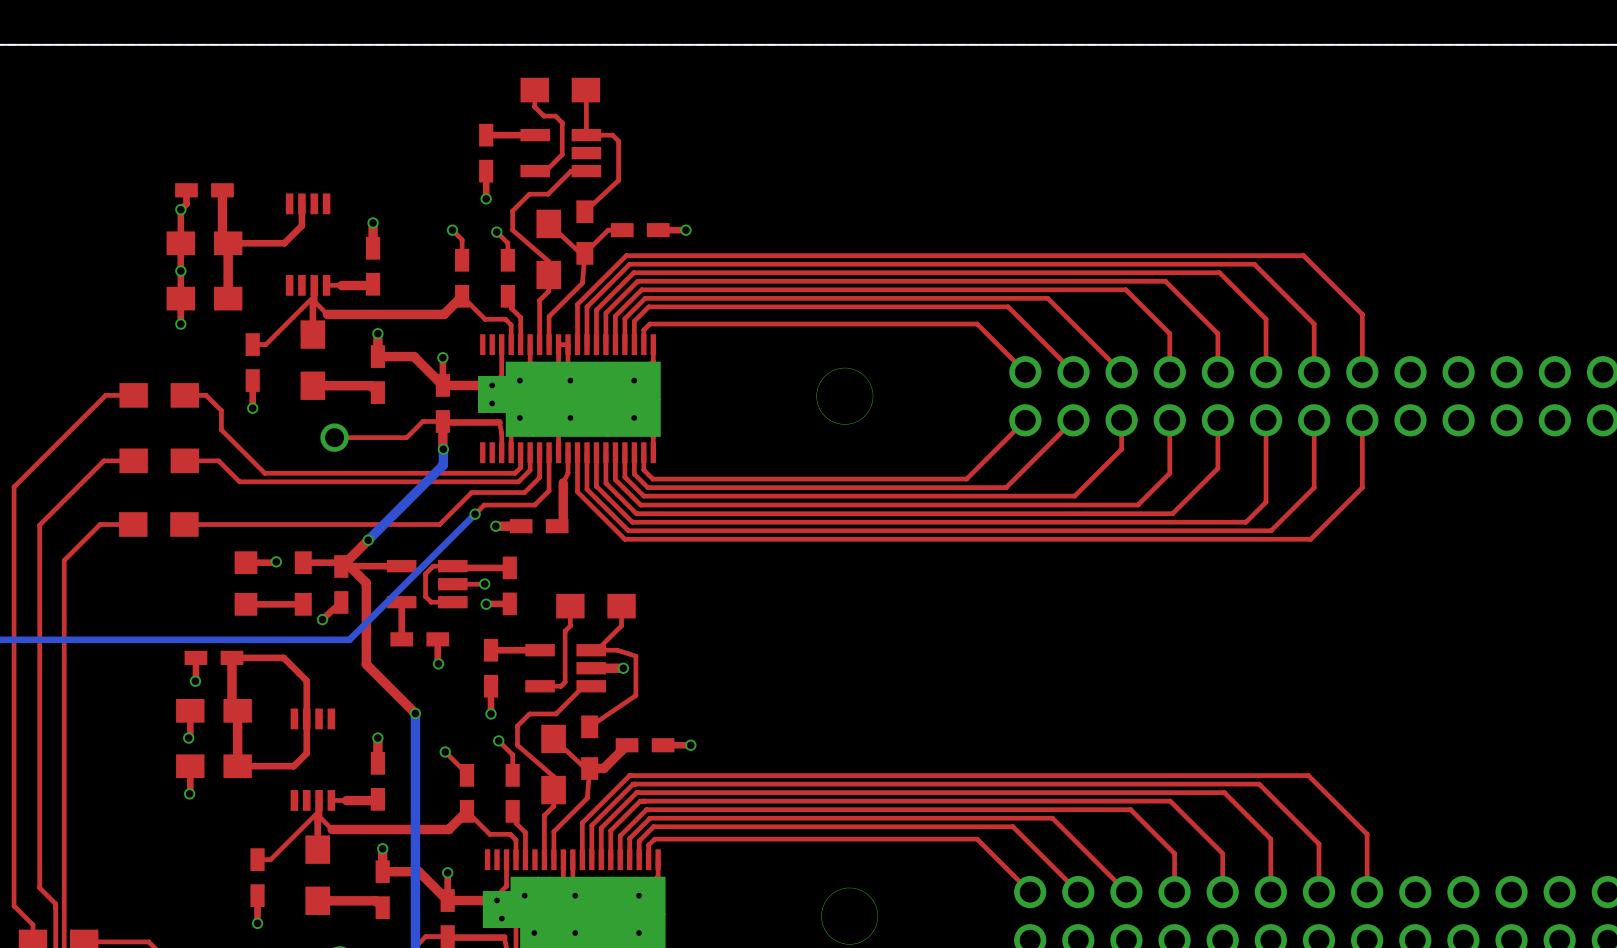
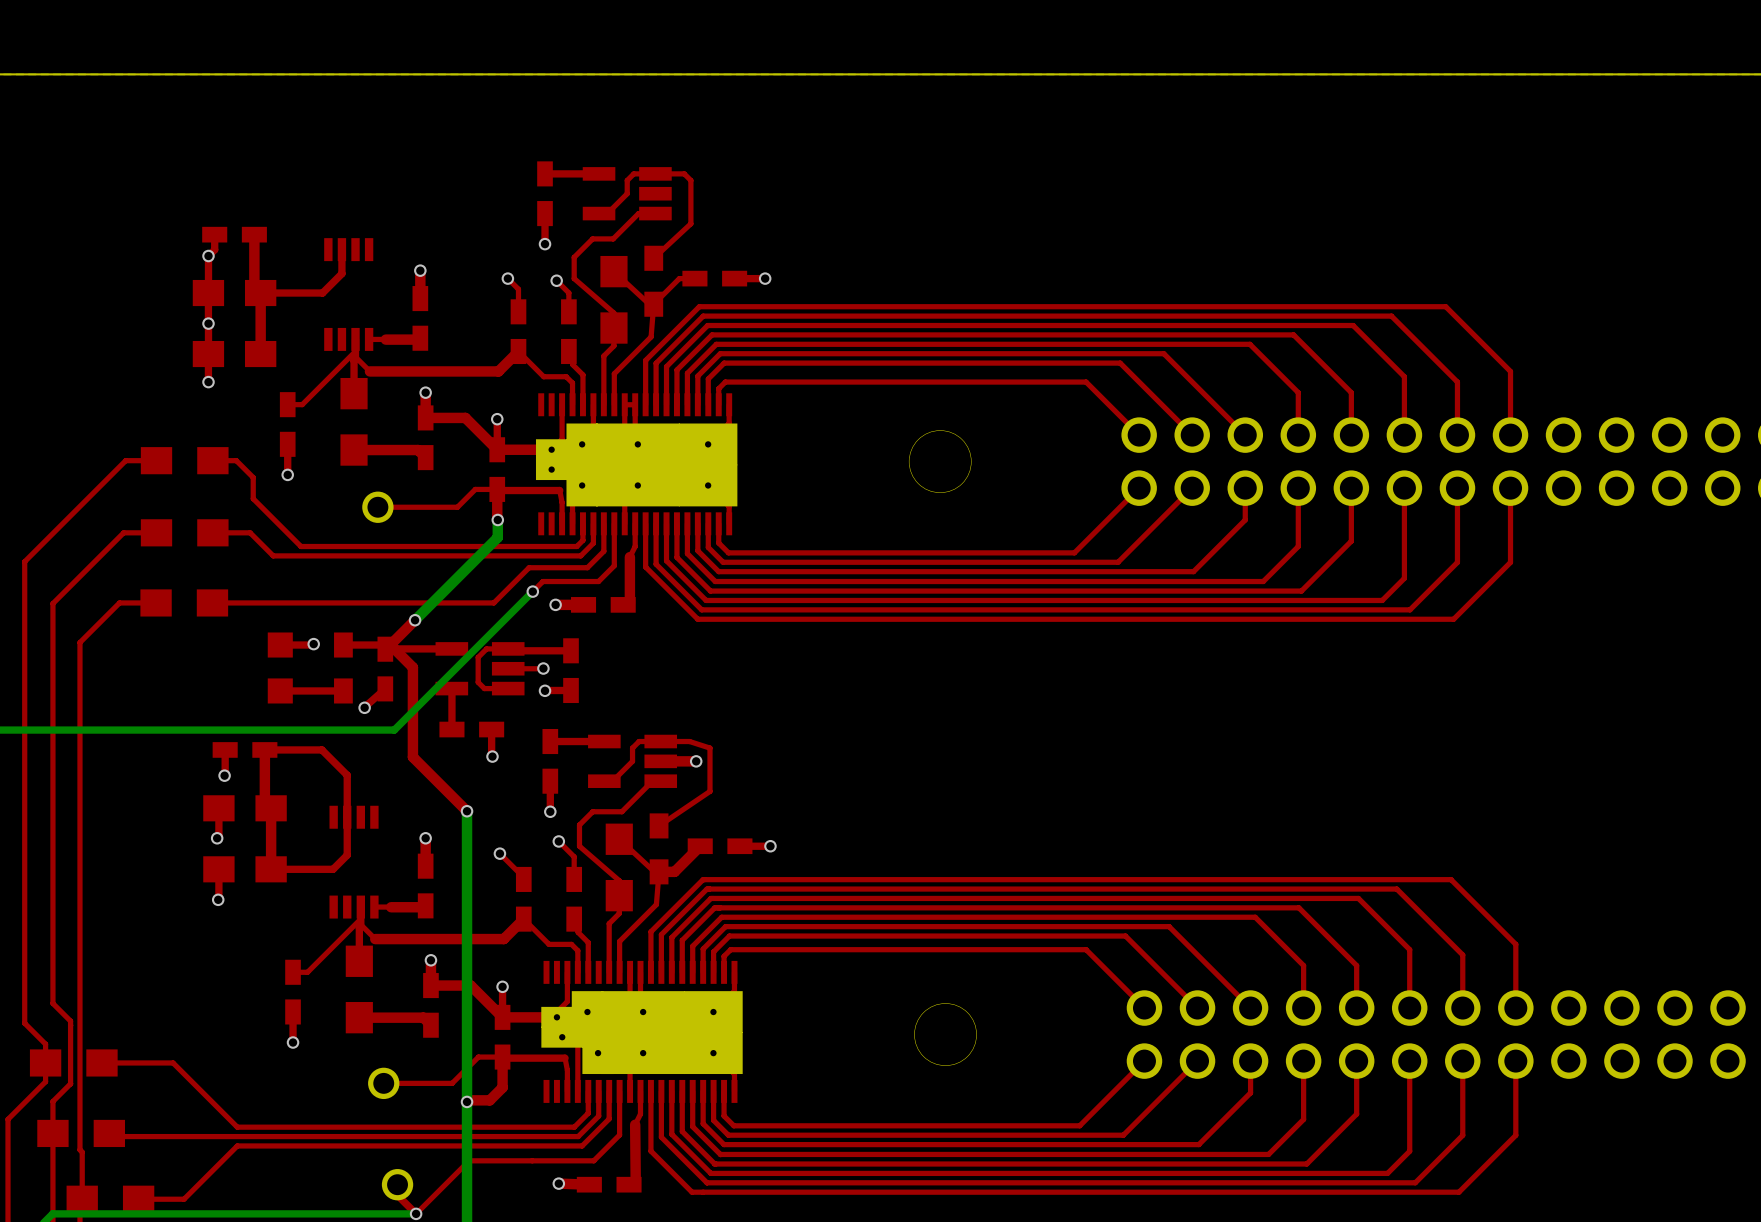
top track: (534, 90) (534, 106) (543, 116) (555, 116) (562, 122) (562, 154) (545, 171) (542, 171) -> (655, 173) (633, 173) (627, 180) (627, 193) (607, 213)
part: (560, 90) -> none
top track: (585, 90) (586, 135) -> none
top track: (570, 606) (570, 625) (565, 631) (565, 682) (561, 686) (547, 686) -> (660, 741) (639, 741) (632, 748) (632, 761) (612, 781)
part: (595, 606) -> none
top track: (621, 606) (621, 625) (597, 650) -> none

